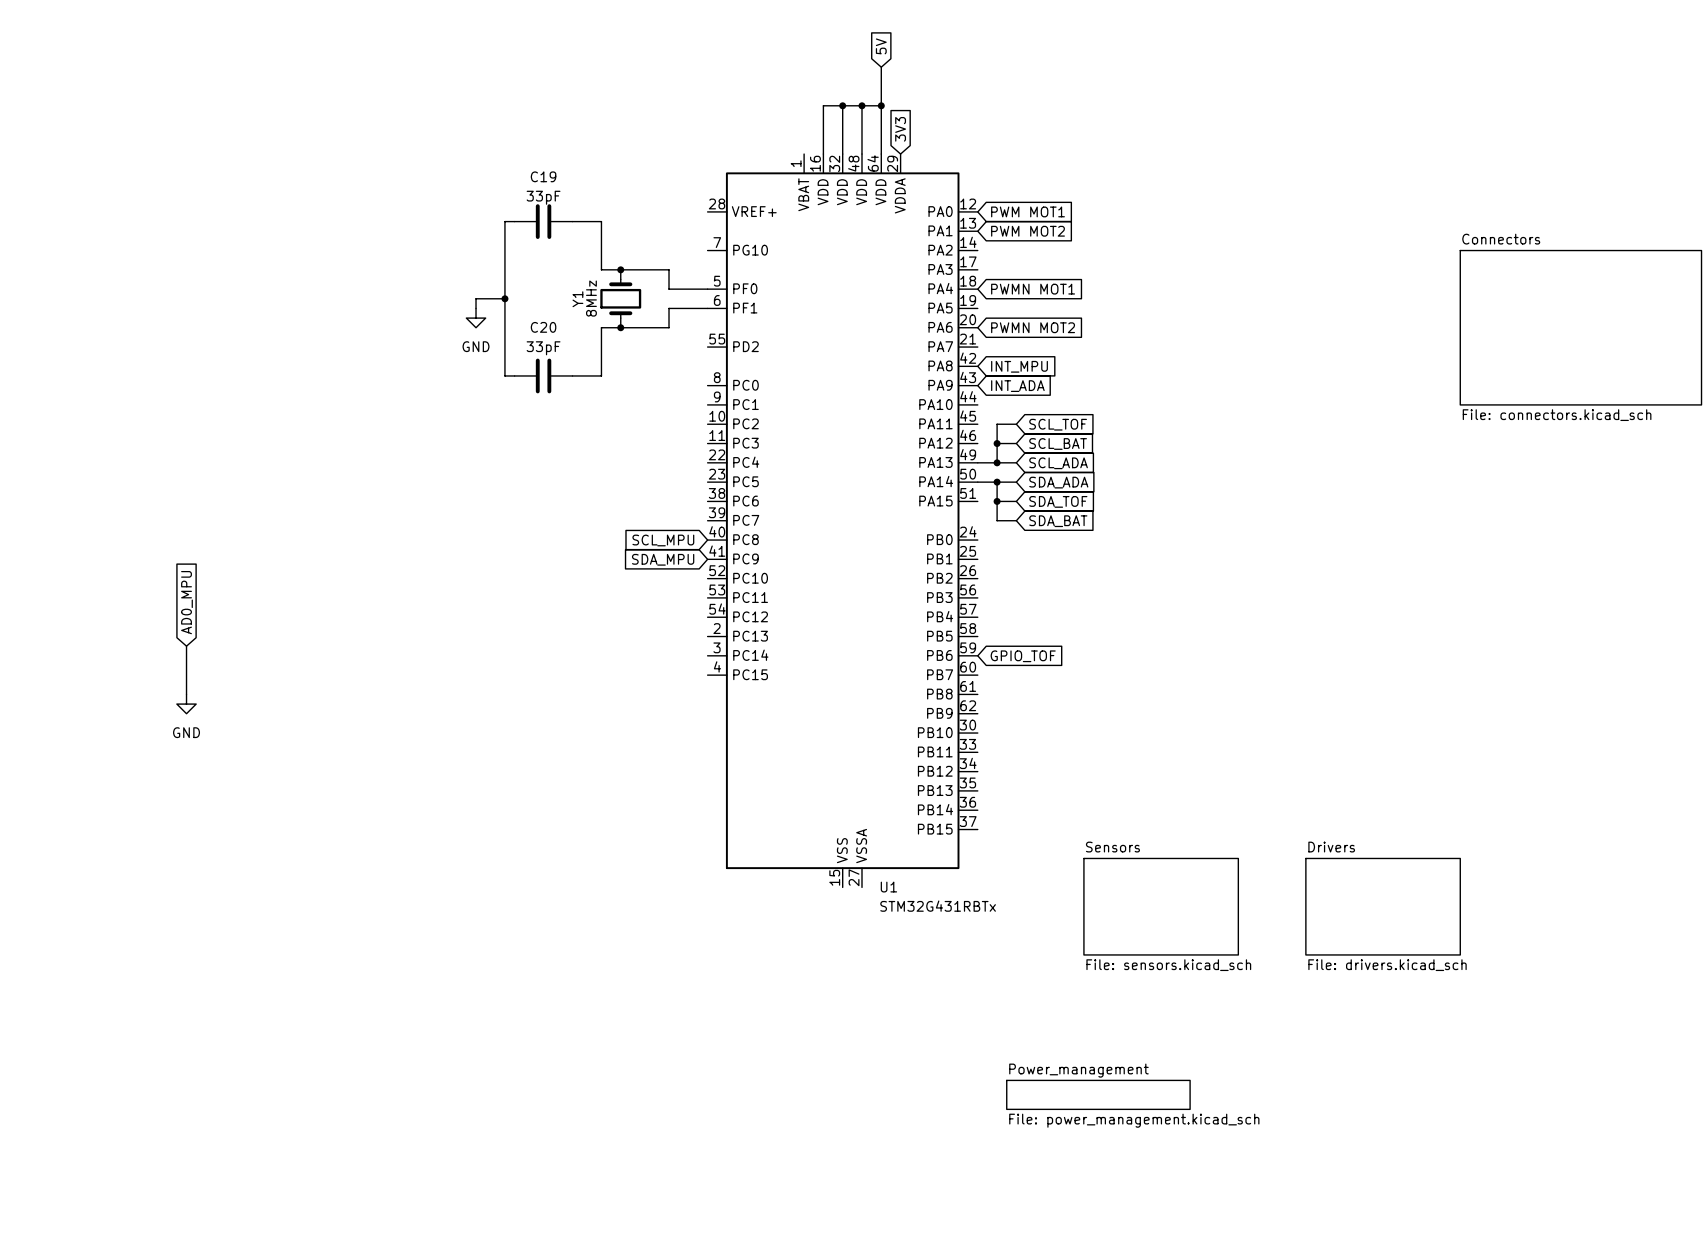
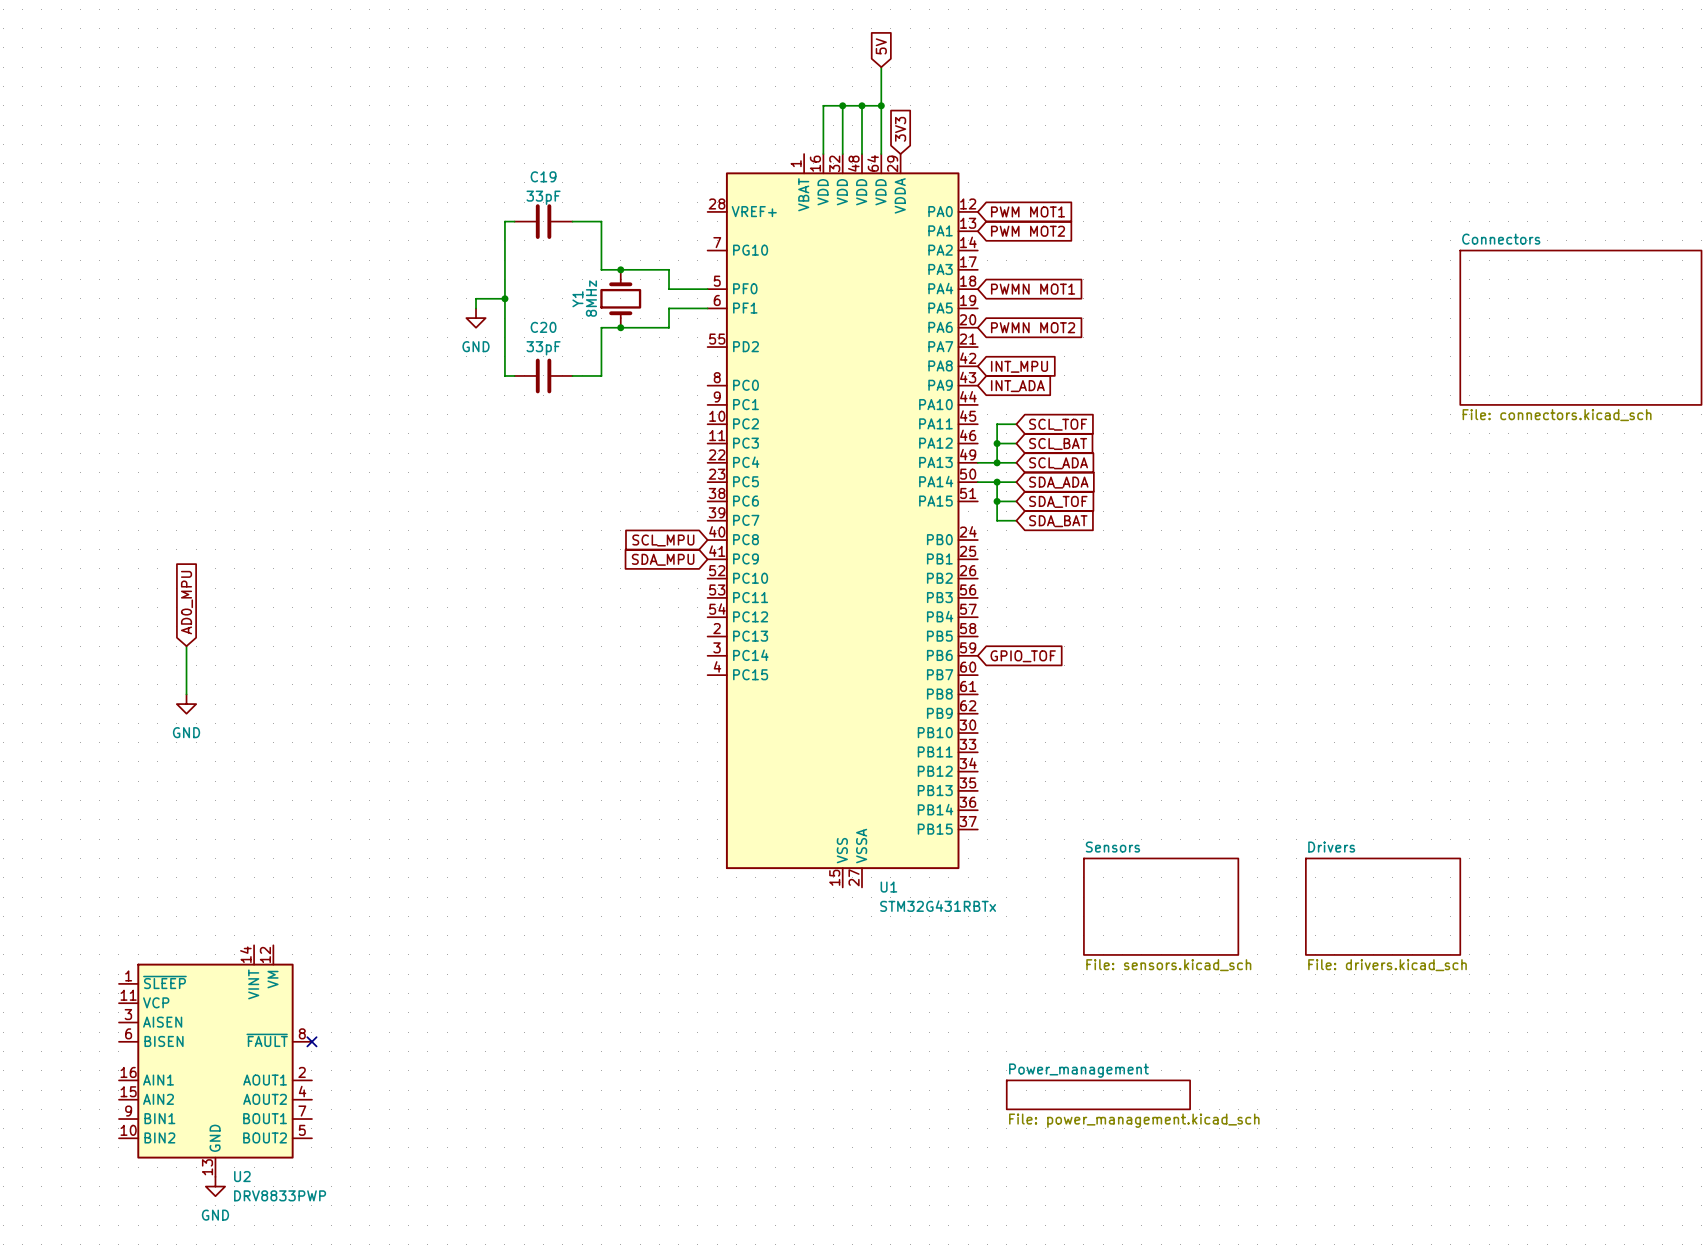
no-connect mark: none -> (311, 1041)
U2: none -> DRV8833PWP (215, 1061)
power symbol: none -> GND (215, 1186)

